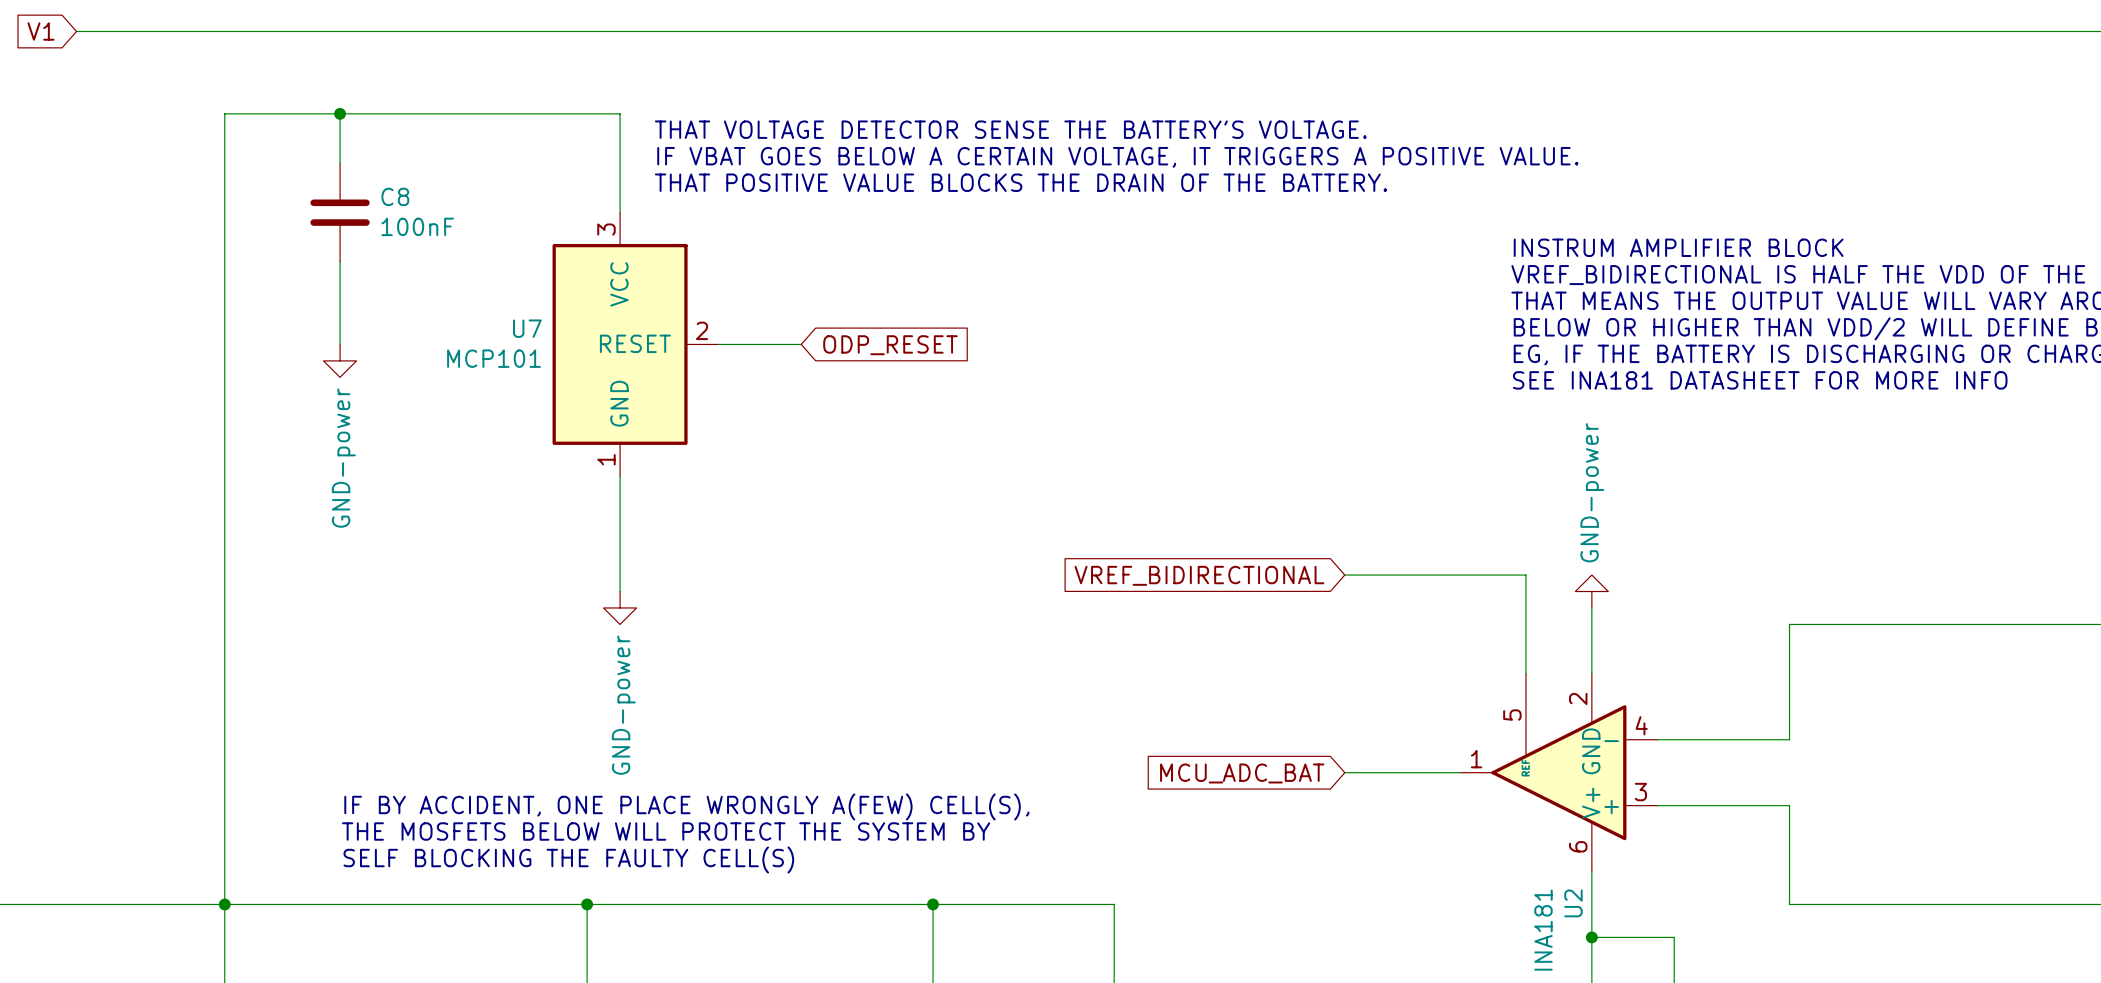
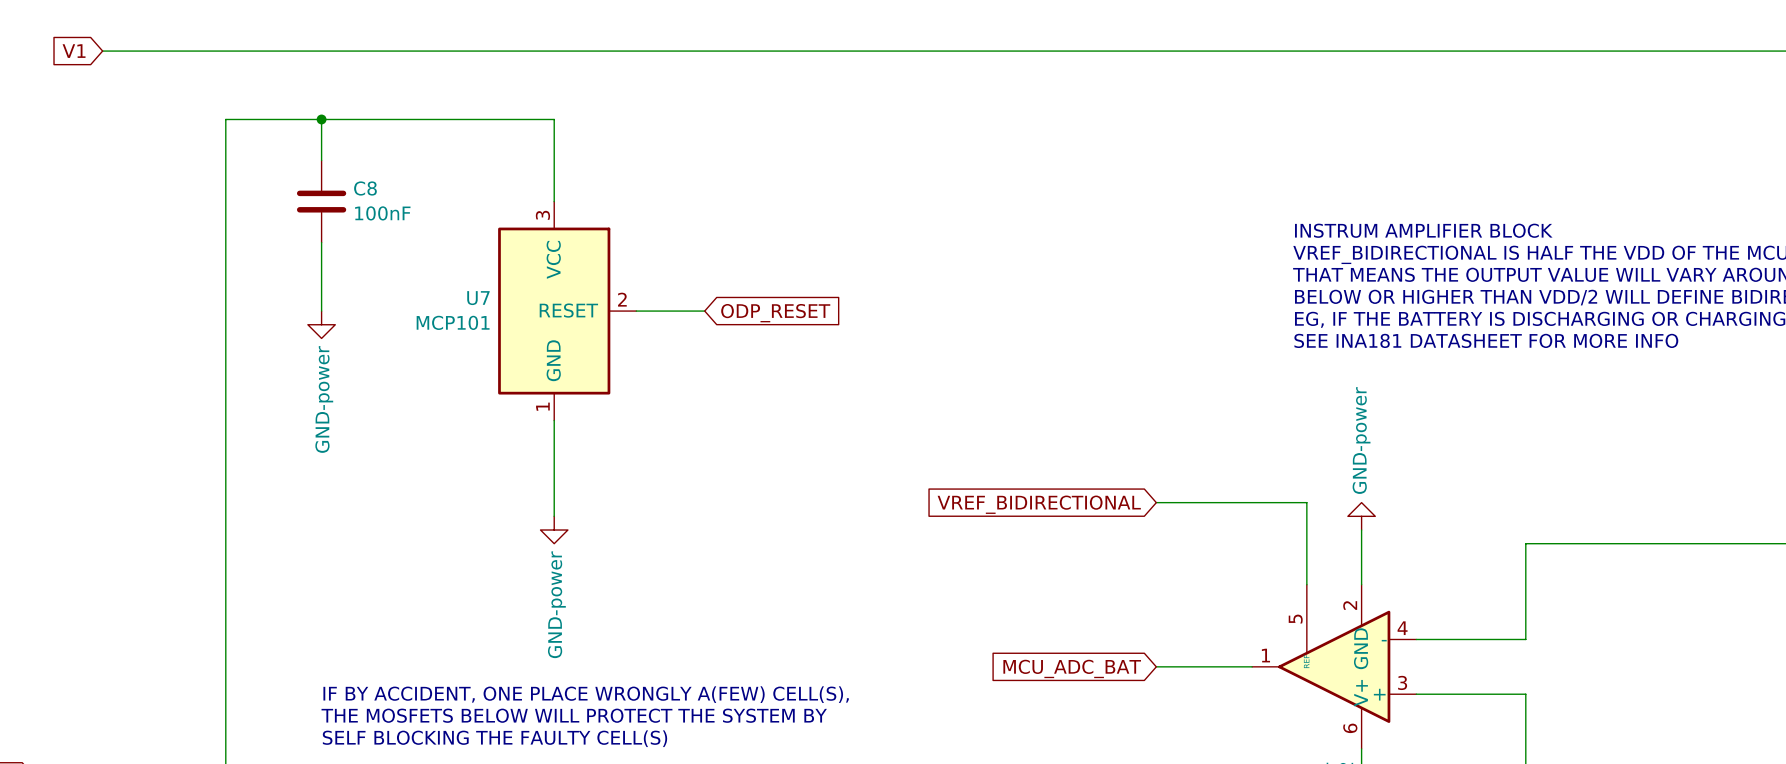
text: THAT VOLTAGE DETECTOR SENSE THE BATTERY'S VOLTAGE. (1010, 129) -> none
text: IF VBAT GOES BELOW A CERTAIN VOLTAGE, IT TRIGGERS A POSITIVE VALUE. (1117, 157) -> none
text: THAT POSITIVE VALUE BLOCKS THE DRAIN OF THE BATTERY. (1020, 182) -> none

